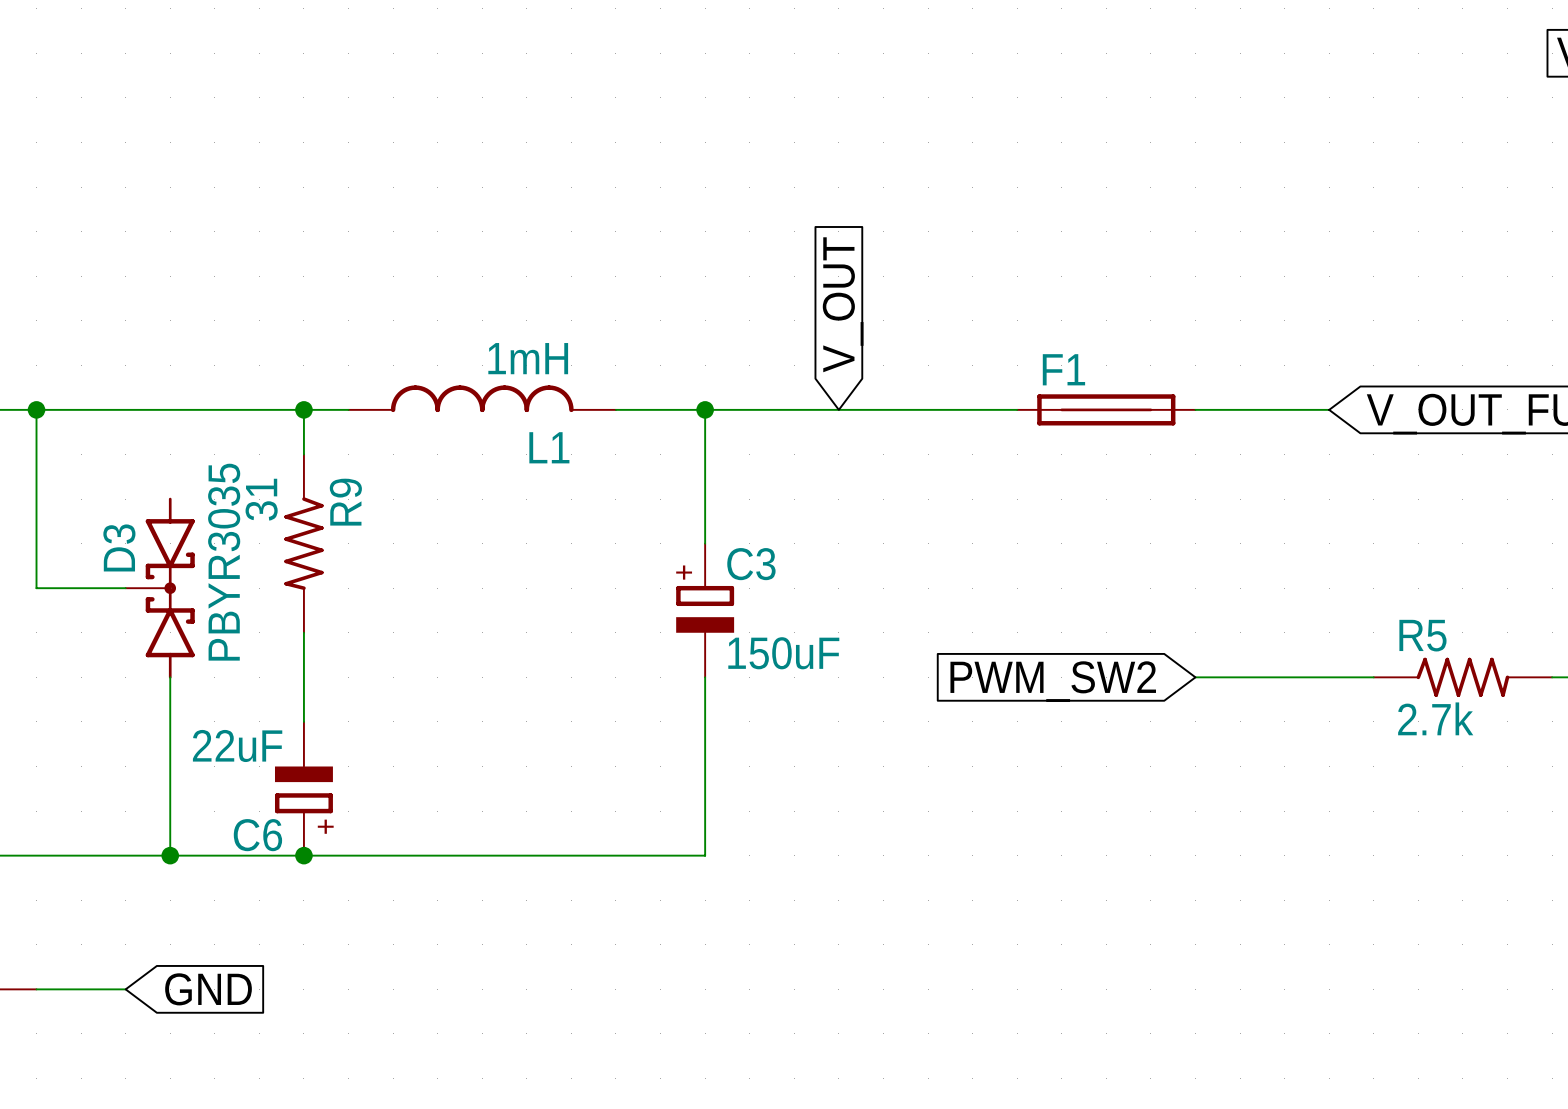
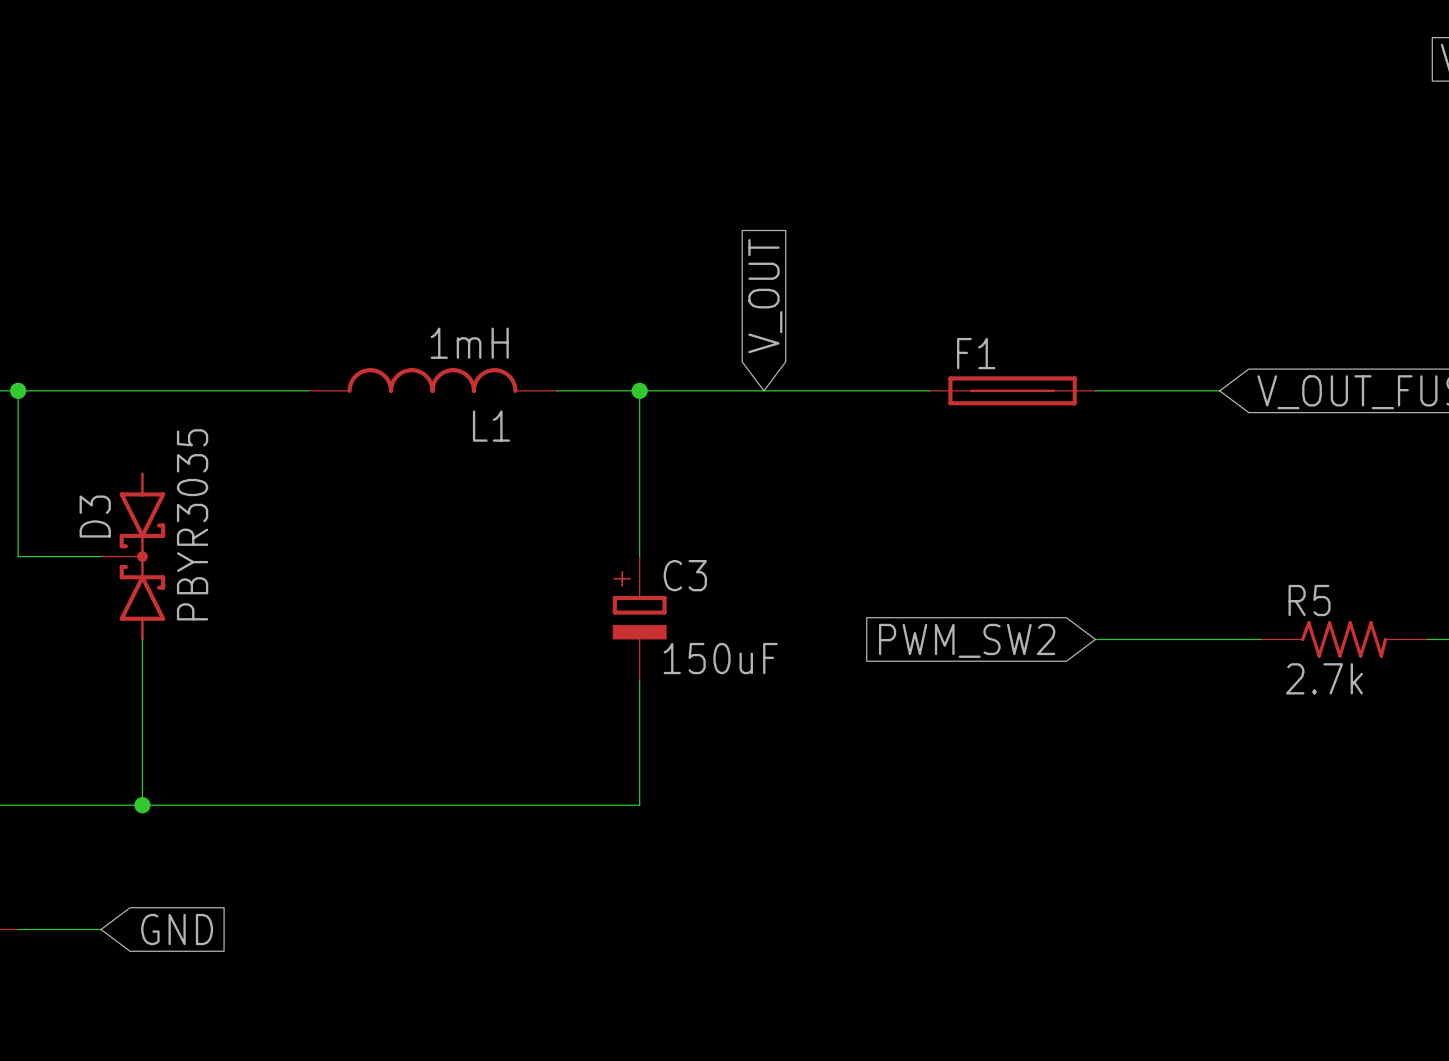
wire: (303, 409) (303, 454) -> none
junction: (303, 409) -> none
R9: 31 (303, 543) -> none
C3 position: (705, 610) -> (639, 618)
wire: (303, 632) (303, 721) -> none
C6: 22uF (303, 788) -> none
junction: (303, 855) -> none

